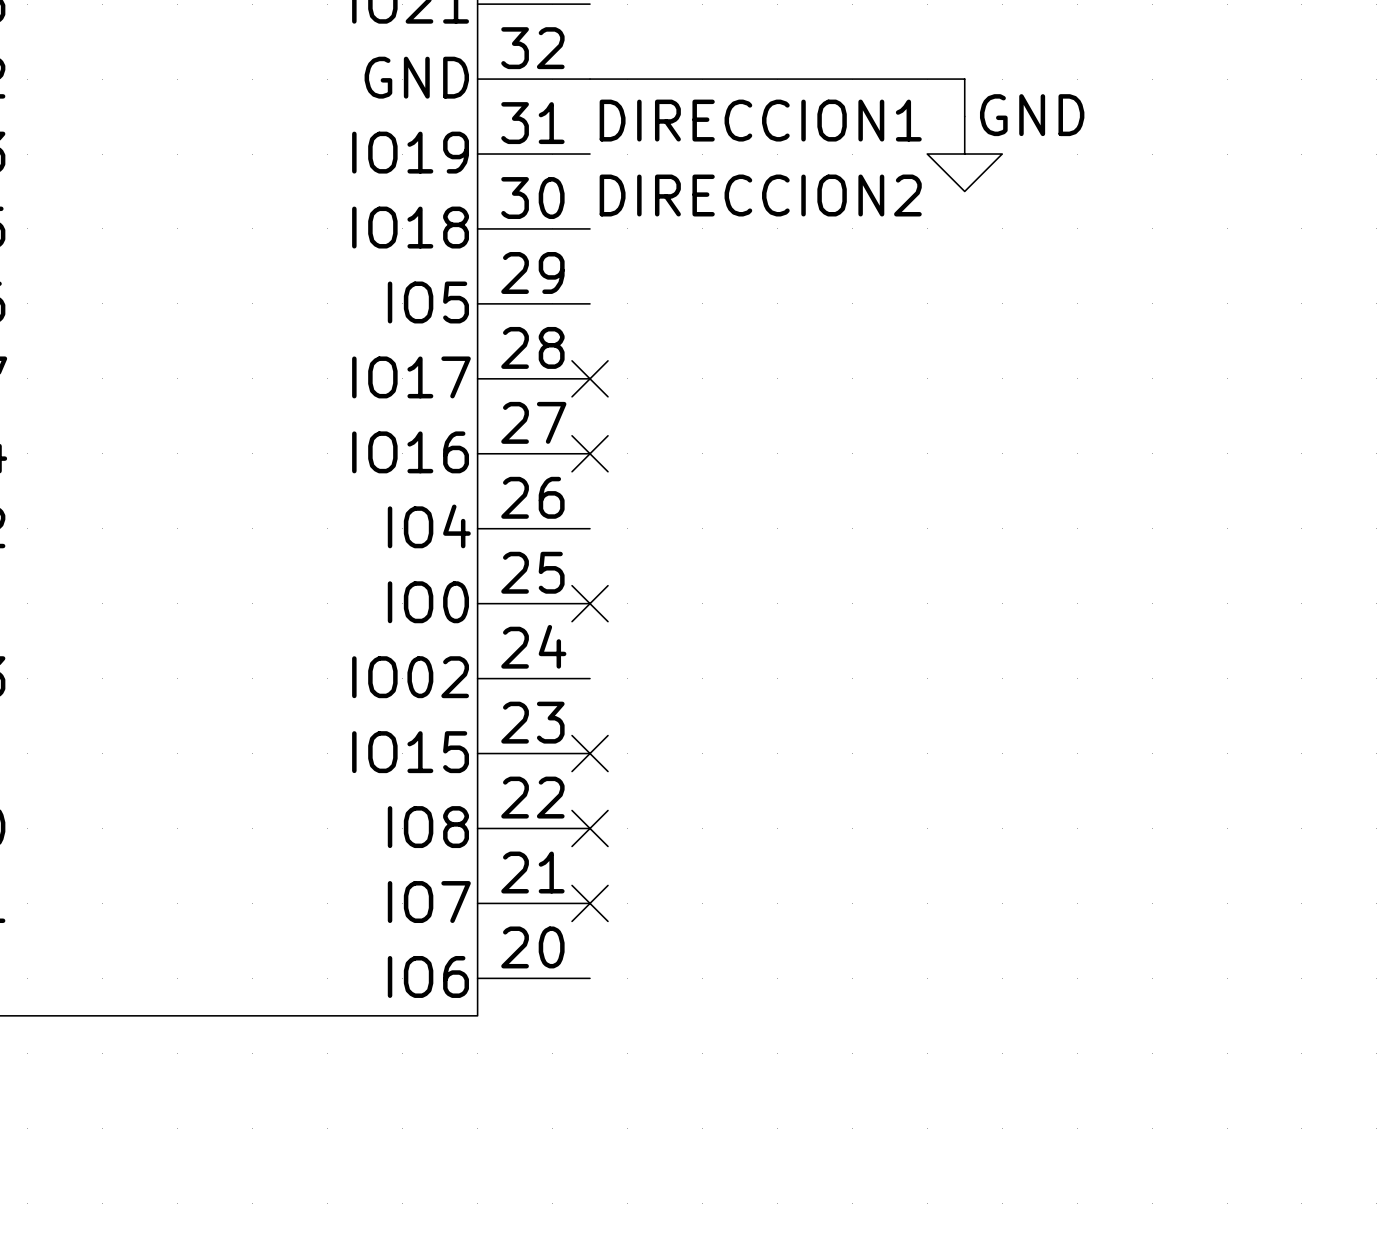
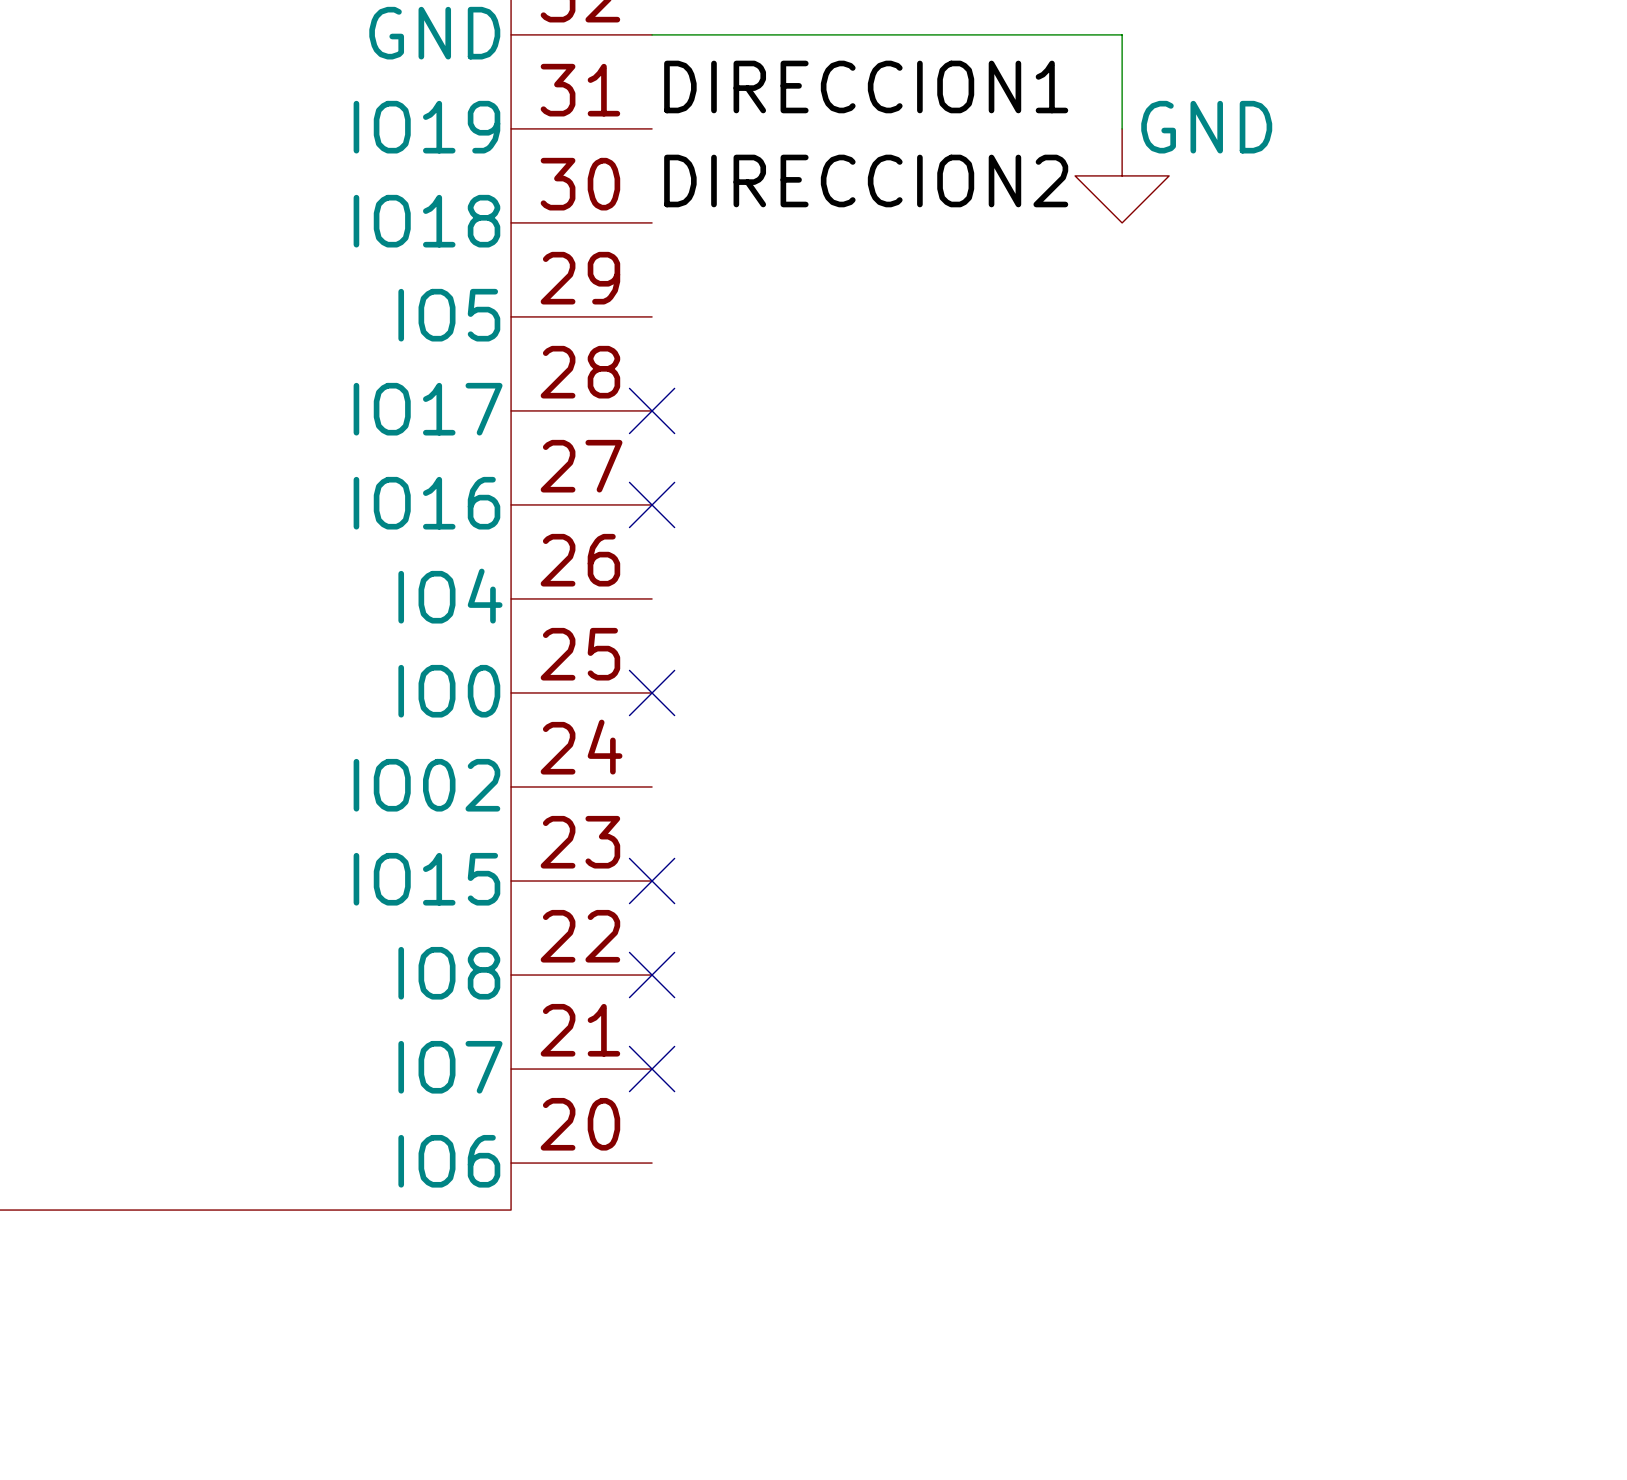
power symbol position: GND (964, 154) -> GND (1122, 175)

